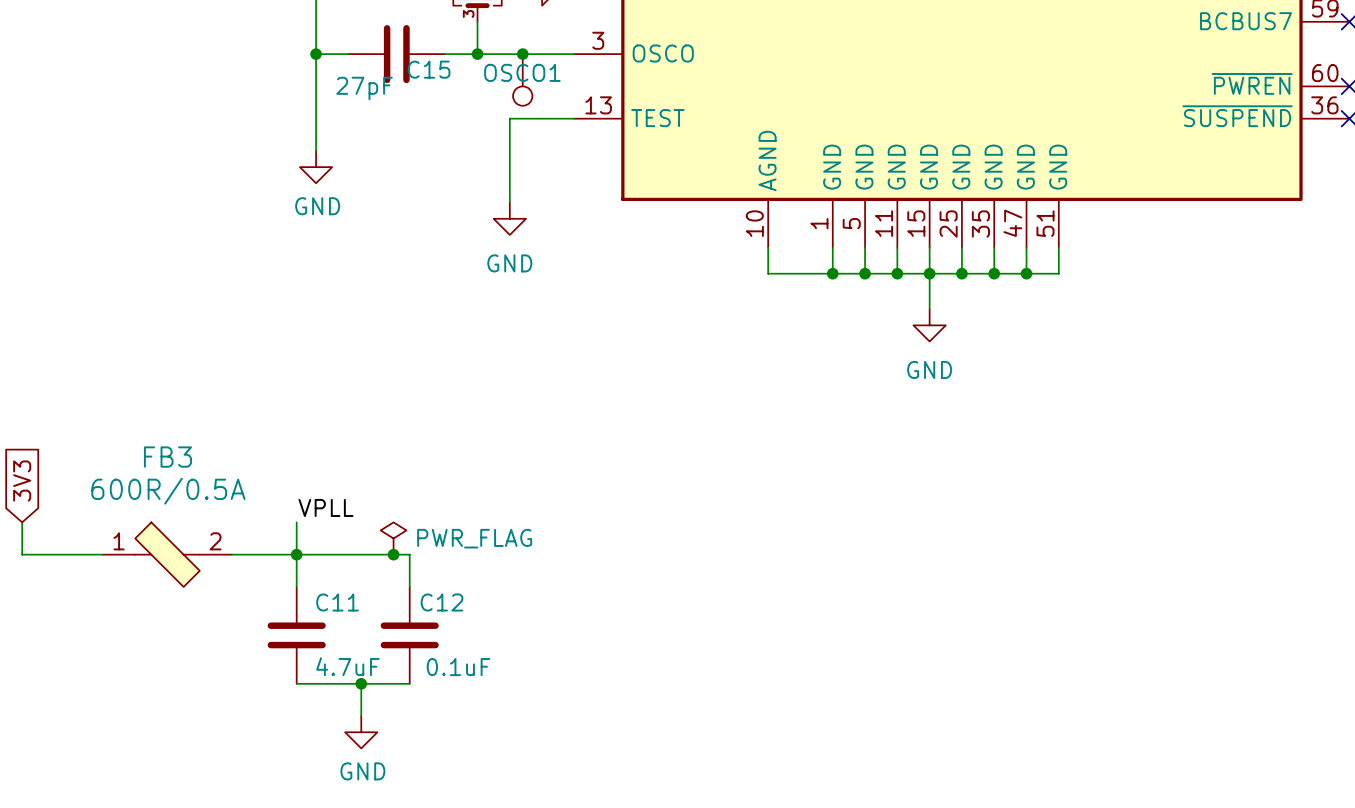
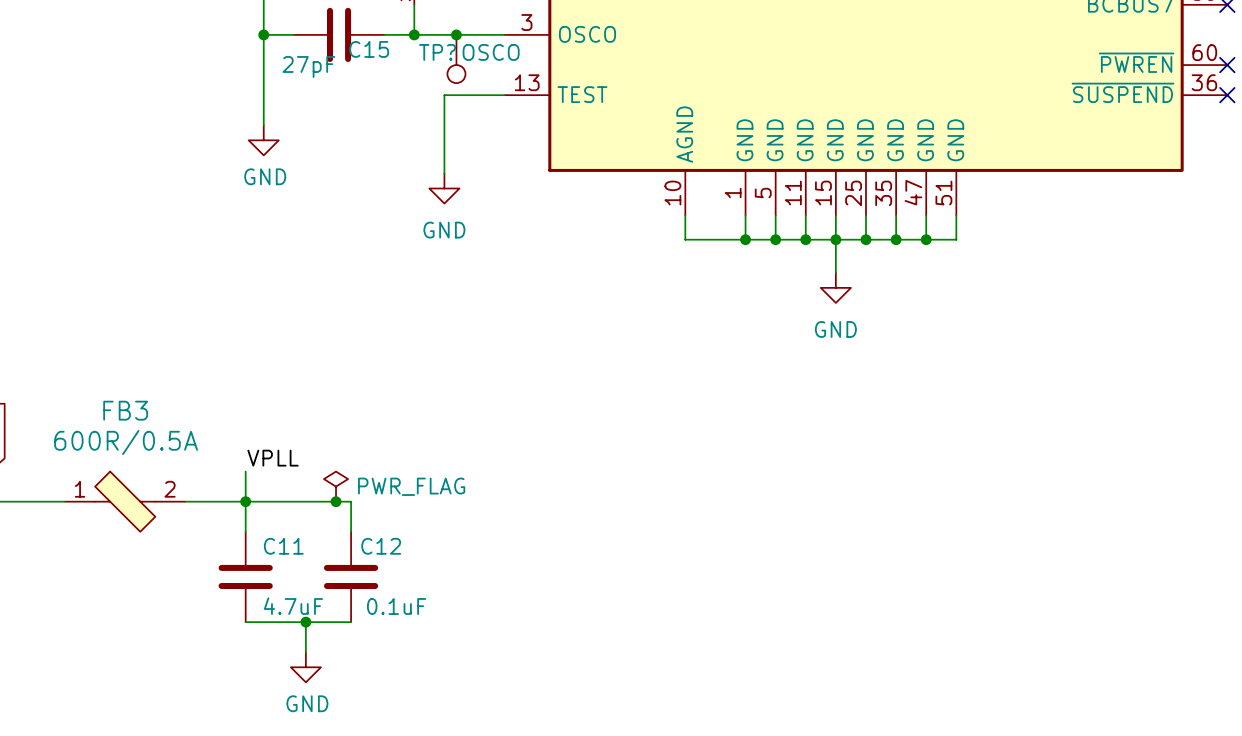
OSCO1 name: OSCO1 (522, 72) -> TP? (437, 52)
OSCO1 value: none -> OSCO (491, 52)

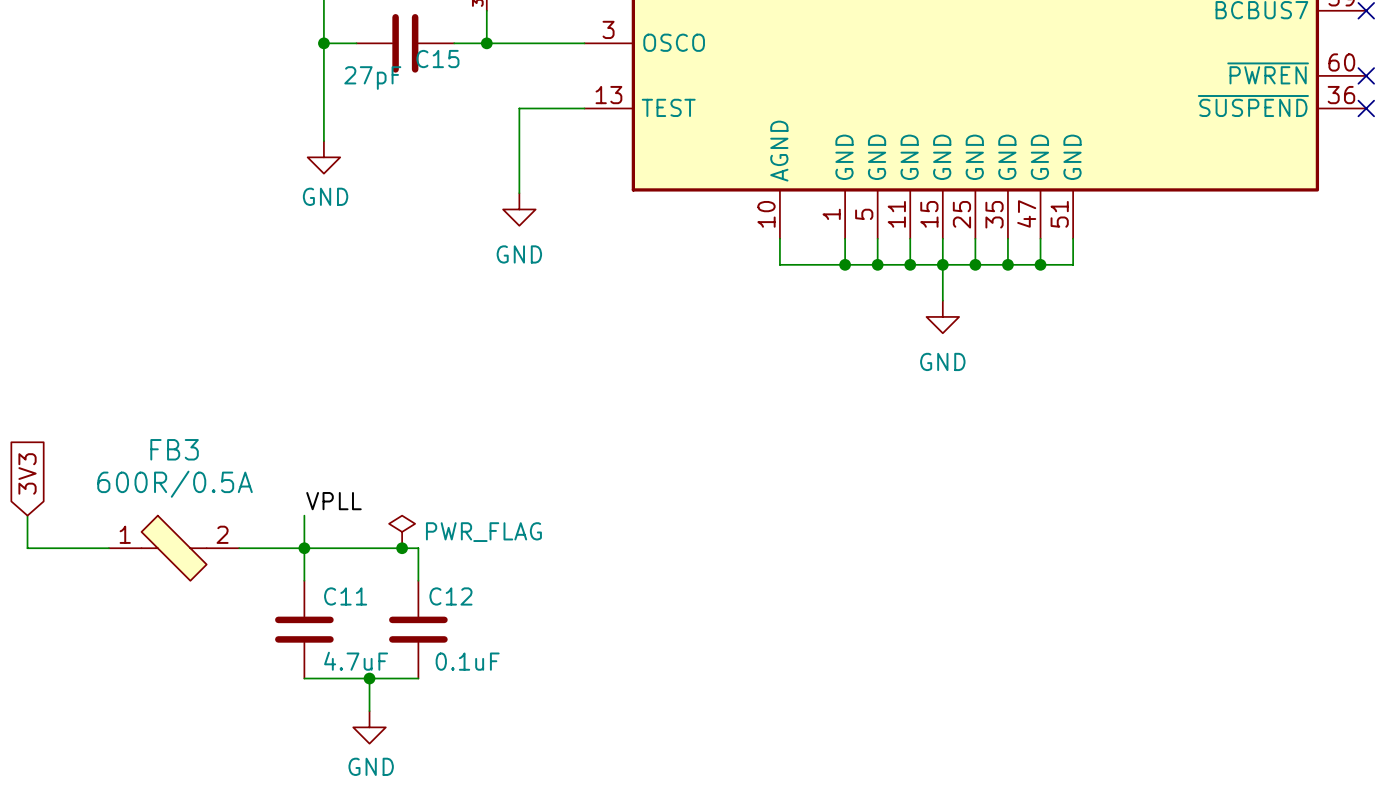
junction: (456, 34) -> none
TP?: OSCO (456, 59) -> none

